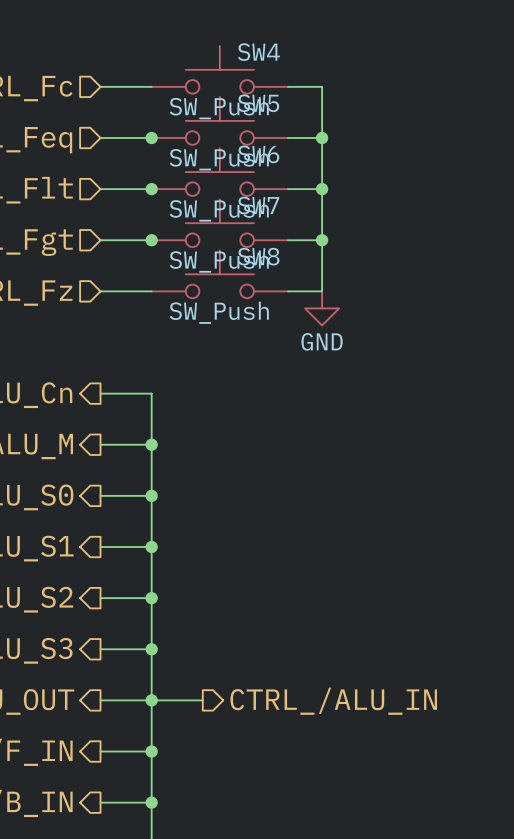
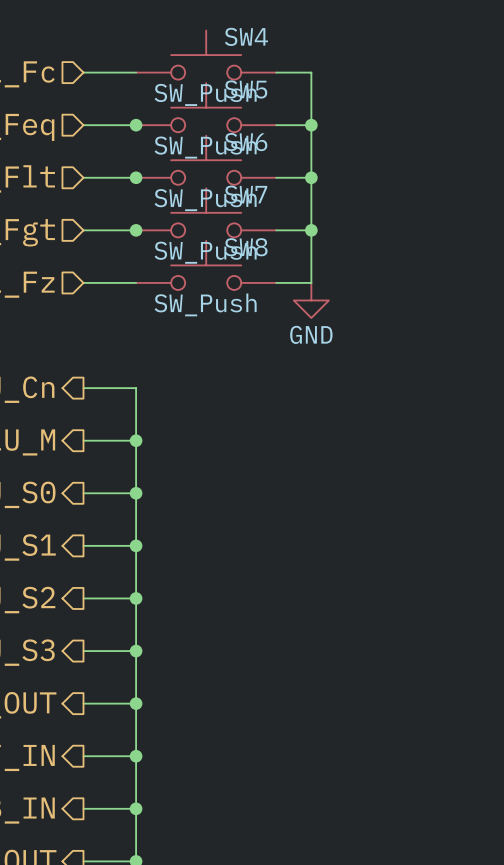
wire: (151, 700) (202, 700) -> none
hierarchical label: CTRL_/ALU_IN (333, 701) -> none

